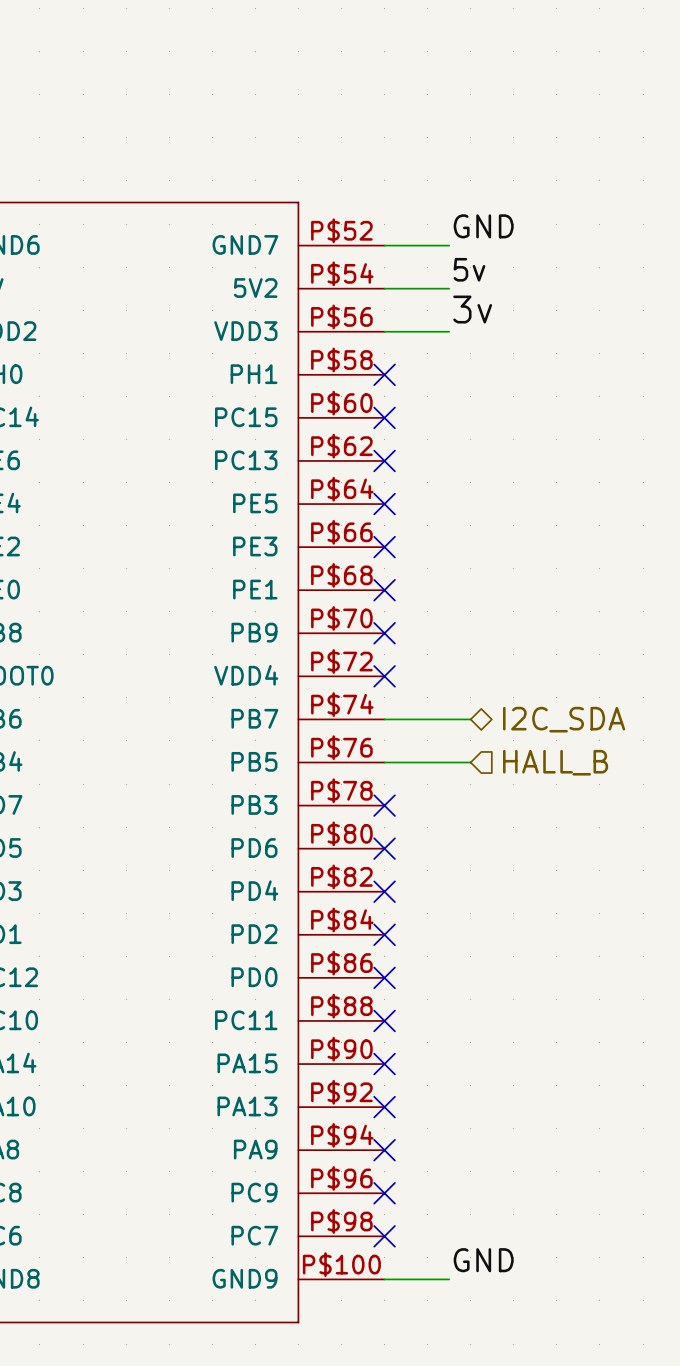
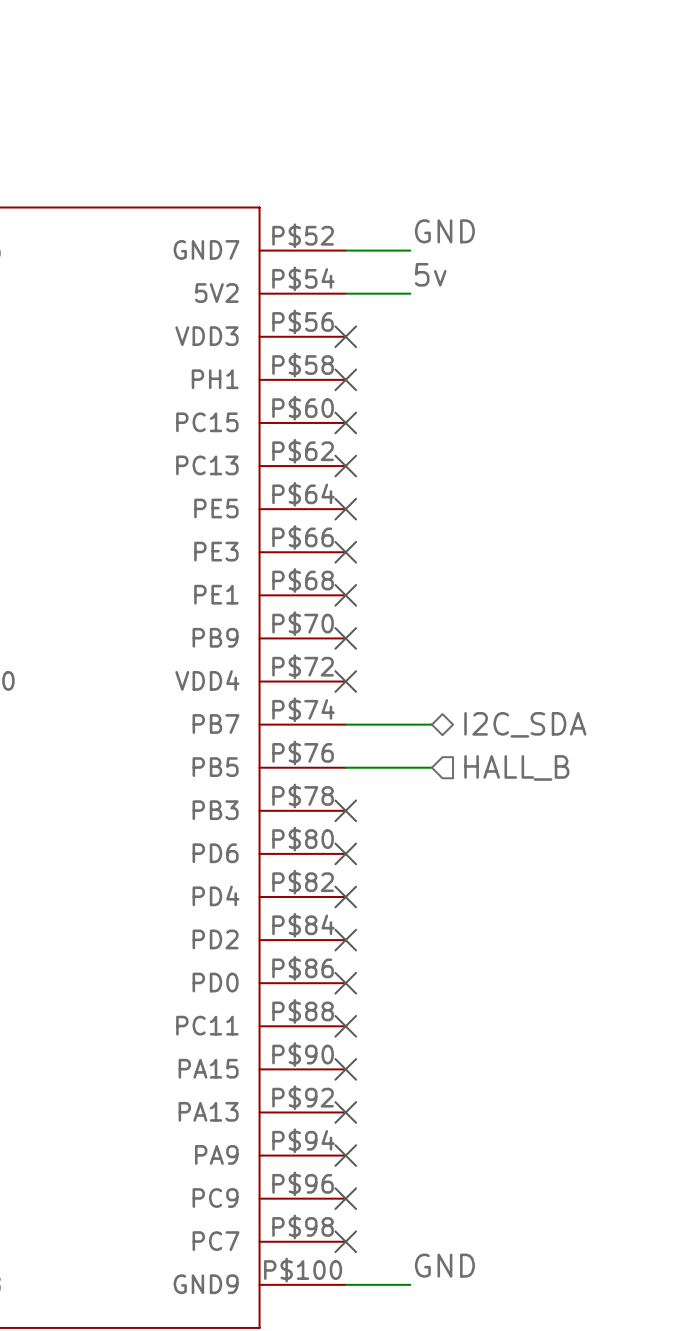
label: 3v (472, 309) -> none
wire: (384, 331) (449, 331) -> none
no-connect mark: none -> (345, 336)

